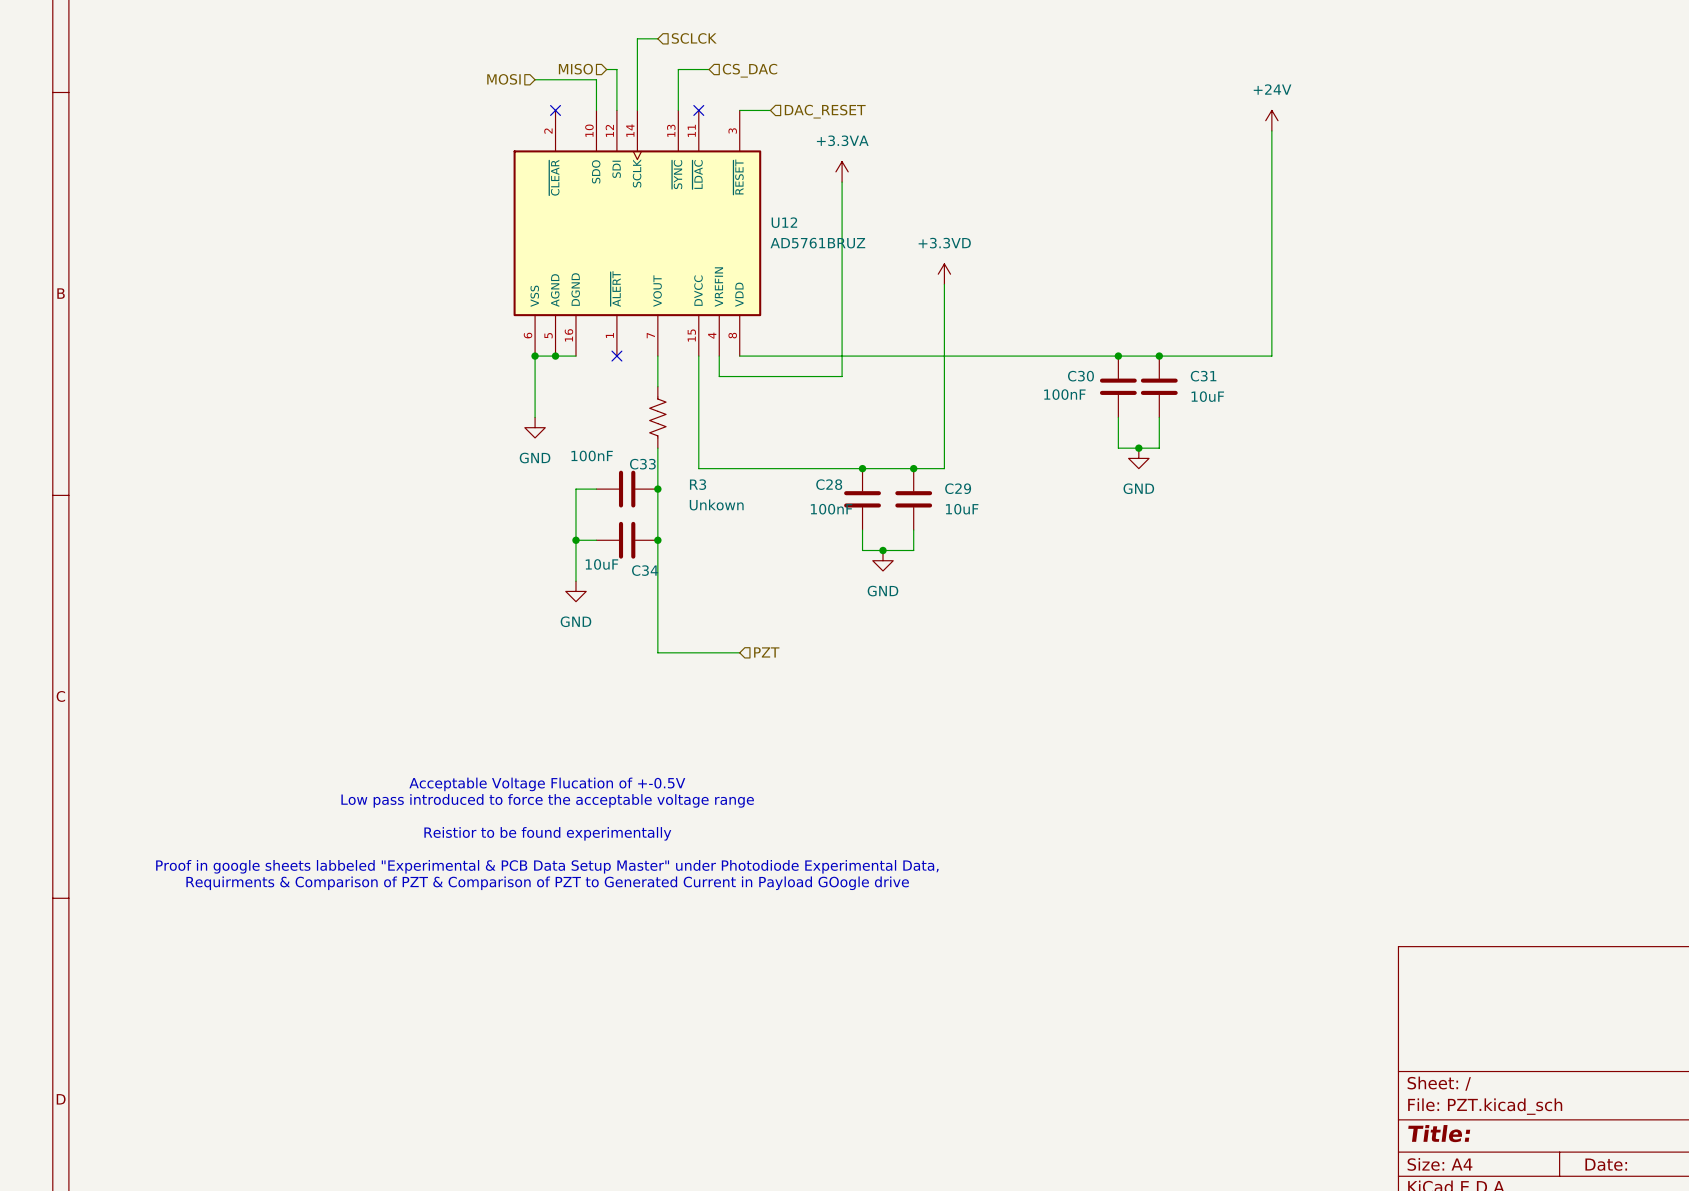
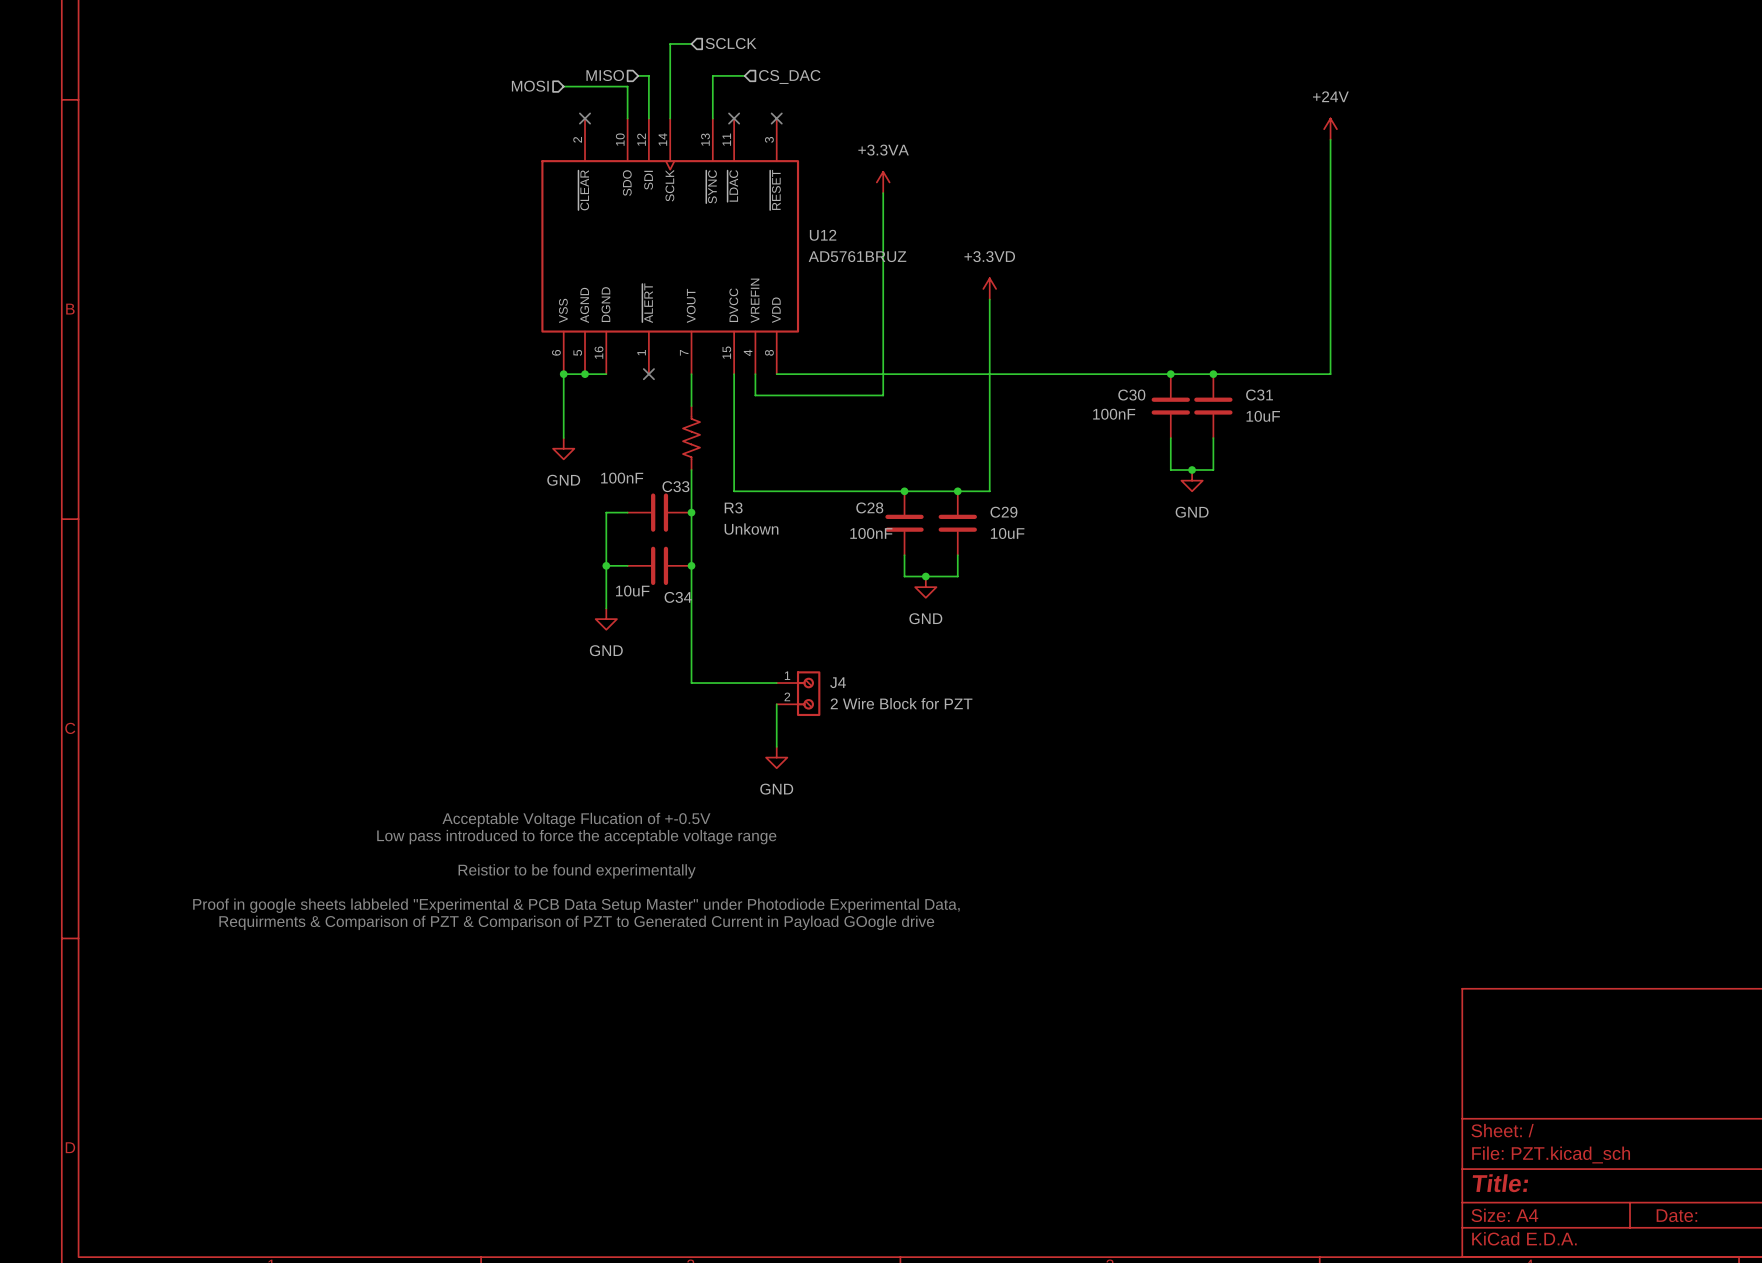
wire: (739, 110) (770, 110) -> none
no-connect mark: none -> (776, 118)
hierarchical label: DAC_RESET (825, 111) -> none
hierarchical label: PZT (766, 652) -> none
J4: none -> 2 Wire Block for PZT (798, 693)
wire: none -> (776, 704) (776, 746)
power symbol: none -> GND (776, 757)

